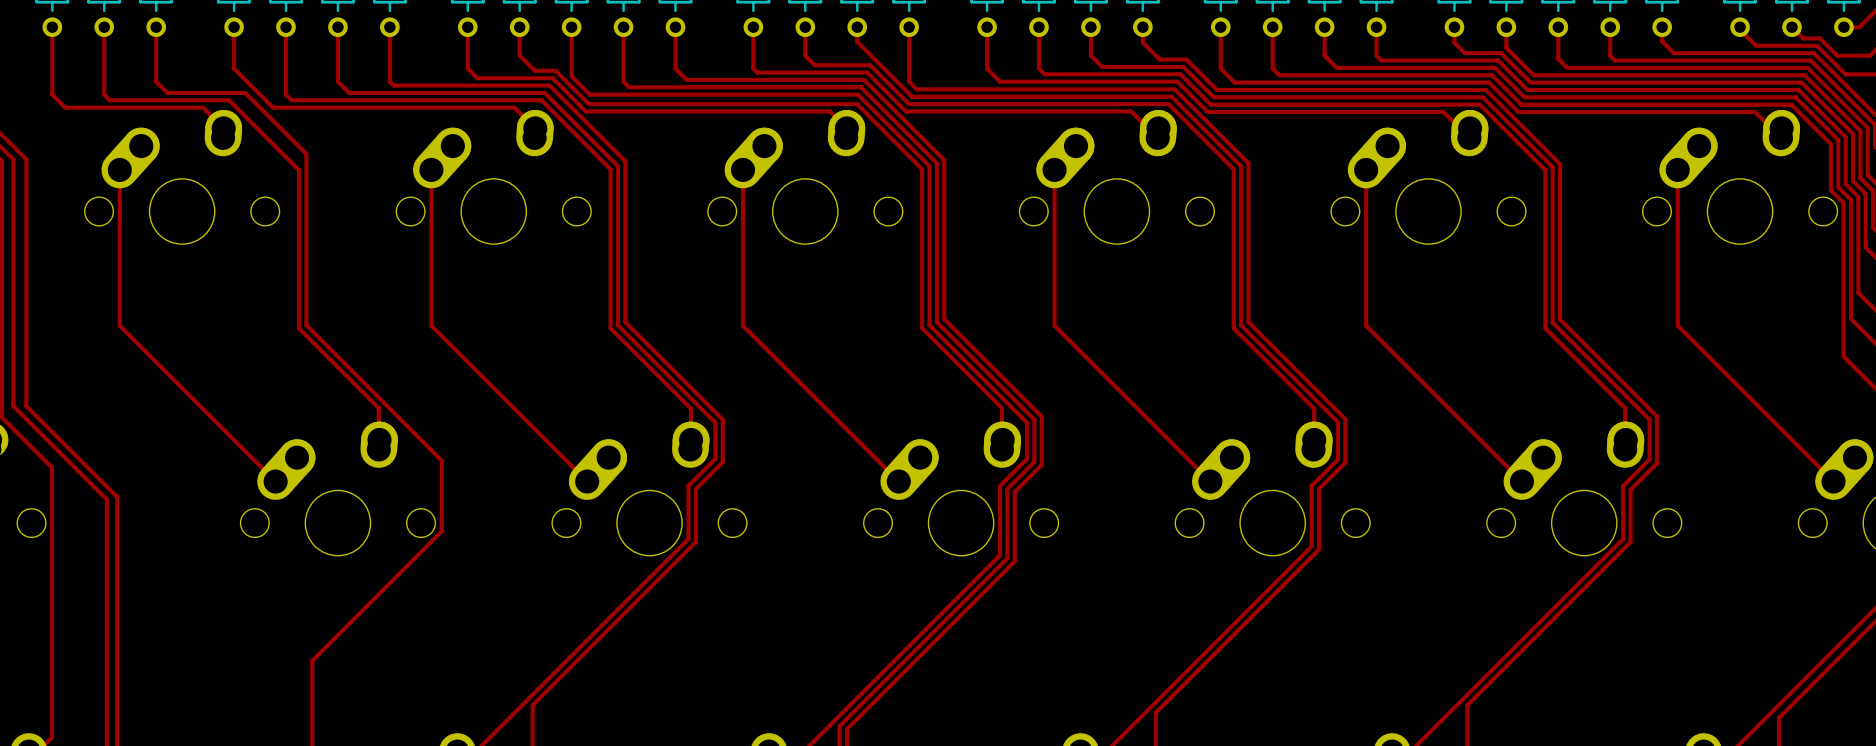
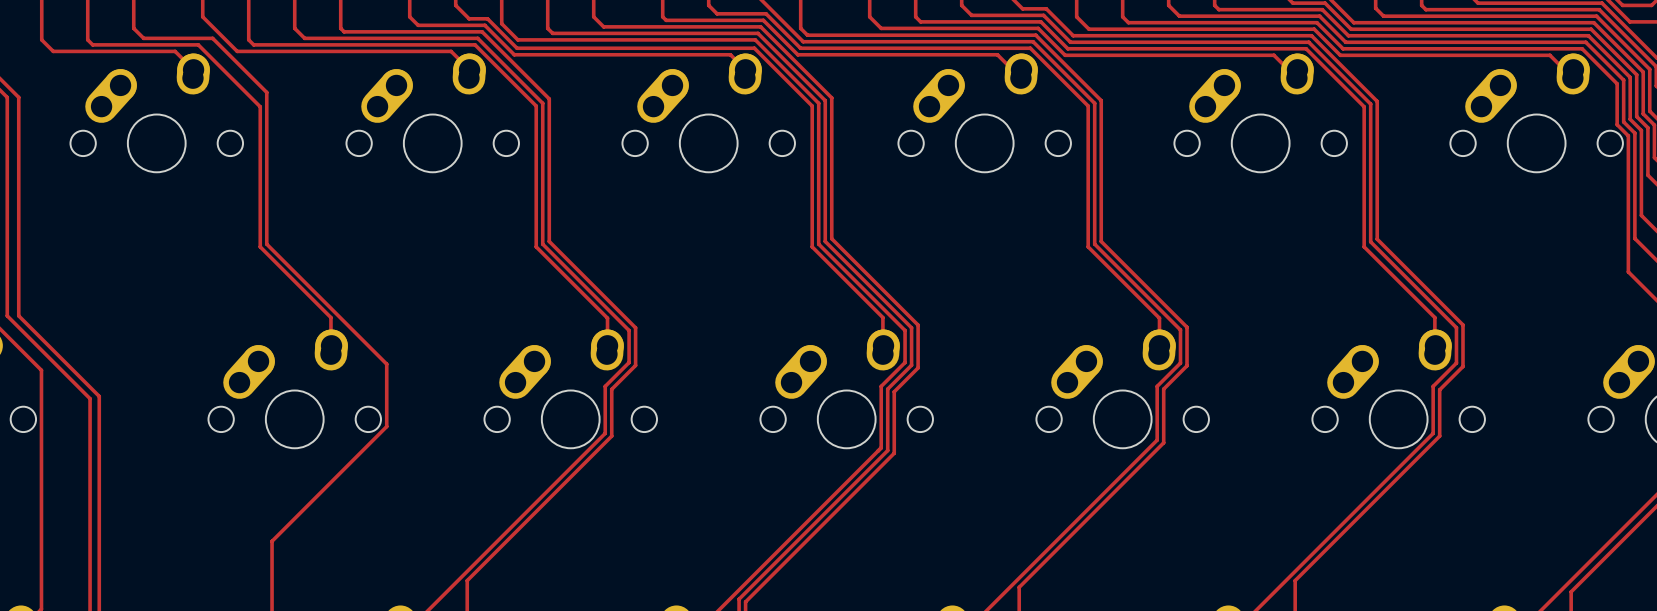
track: (119, 169) (119, 325) (275, 481) -> none
track: (431, 169) (431, 325) (587, 481) -> none
track: (743, 169) (743, 325) (898, 481) -> none
track: (1054, 169) (1054, 325) (1210, 481) -> none
track: (1366, 169) (1366, 325) (1521, 481) -> none
track: (1677, 169) (1677, 325) (1833, 481) -> none

